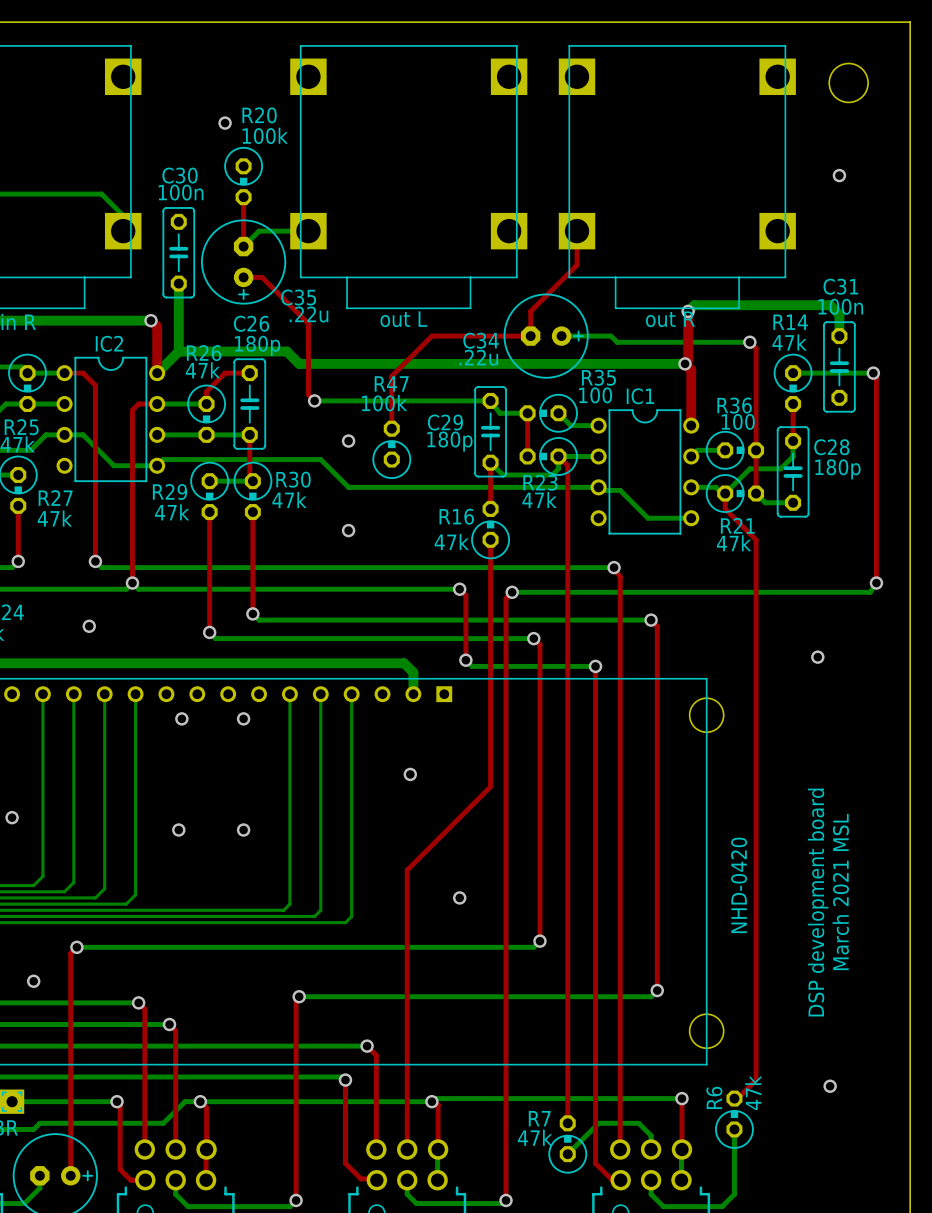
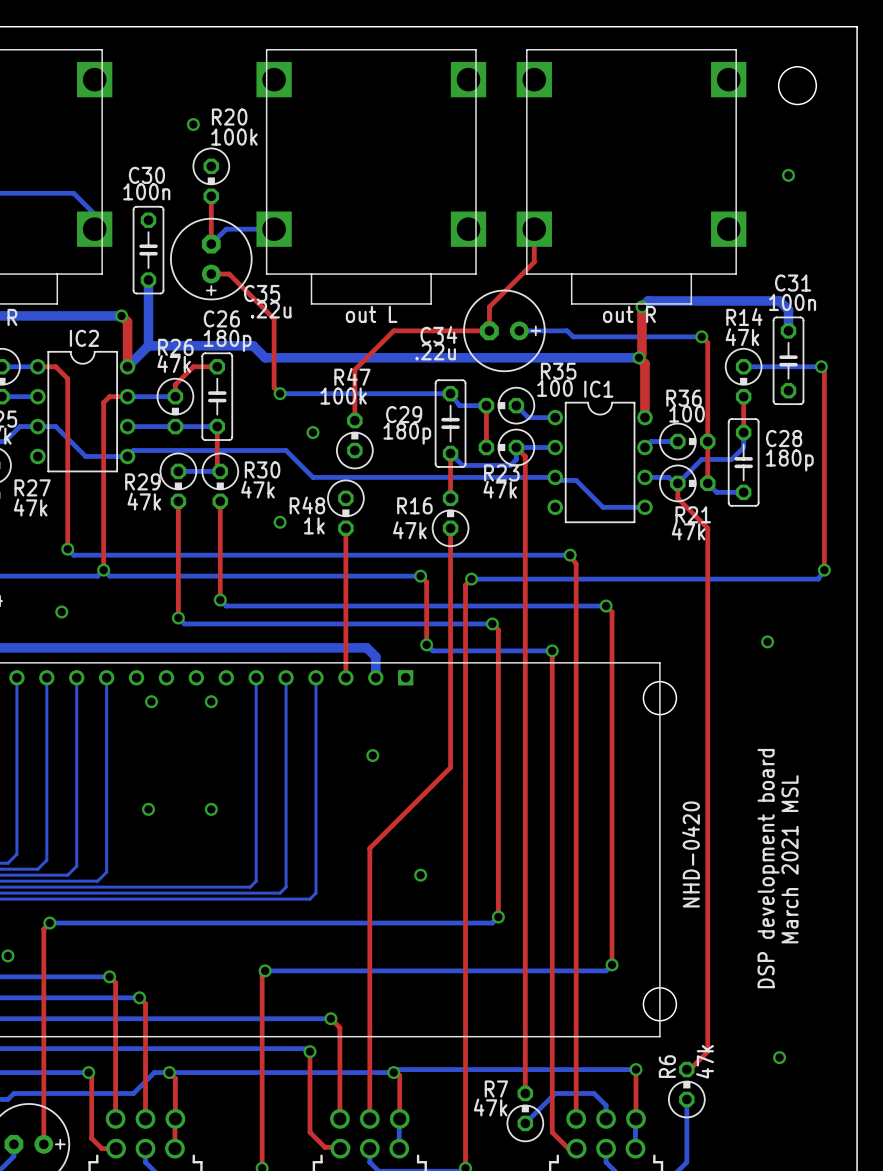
R48: none -> 1k (345, 507)
via position: (348, 530) -> (280, 522)
top track: none -> (345, 528) (345, 677)

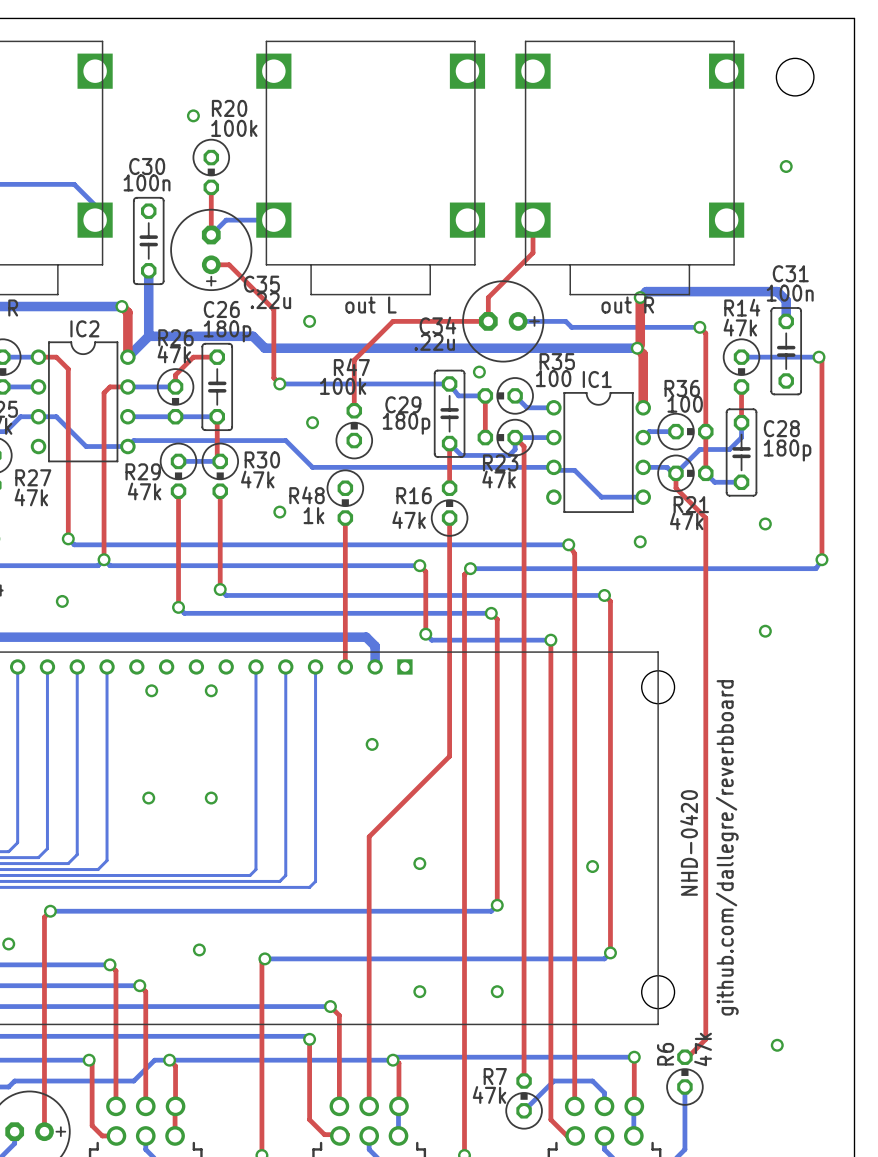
via: none -> (309, 321)
via: none -> (479, 372)
via: none -> (765, 523)
via: none -> (640, 541)
text: none -> github.com/dallegre/reverbboard (727, 847)
text: March 2021 MSL (790, 859) -> none
text: DSP development board (768, 868) -> none
via: none -> (592, 866)
via: none -> (199, 949)
via: none -> (419, 991)
via: none -> (497, 991)

